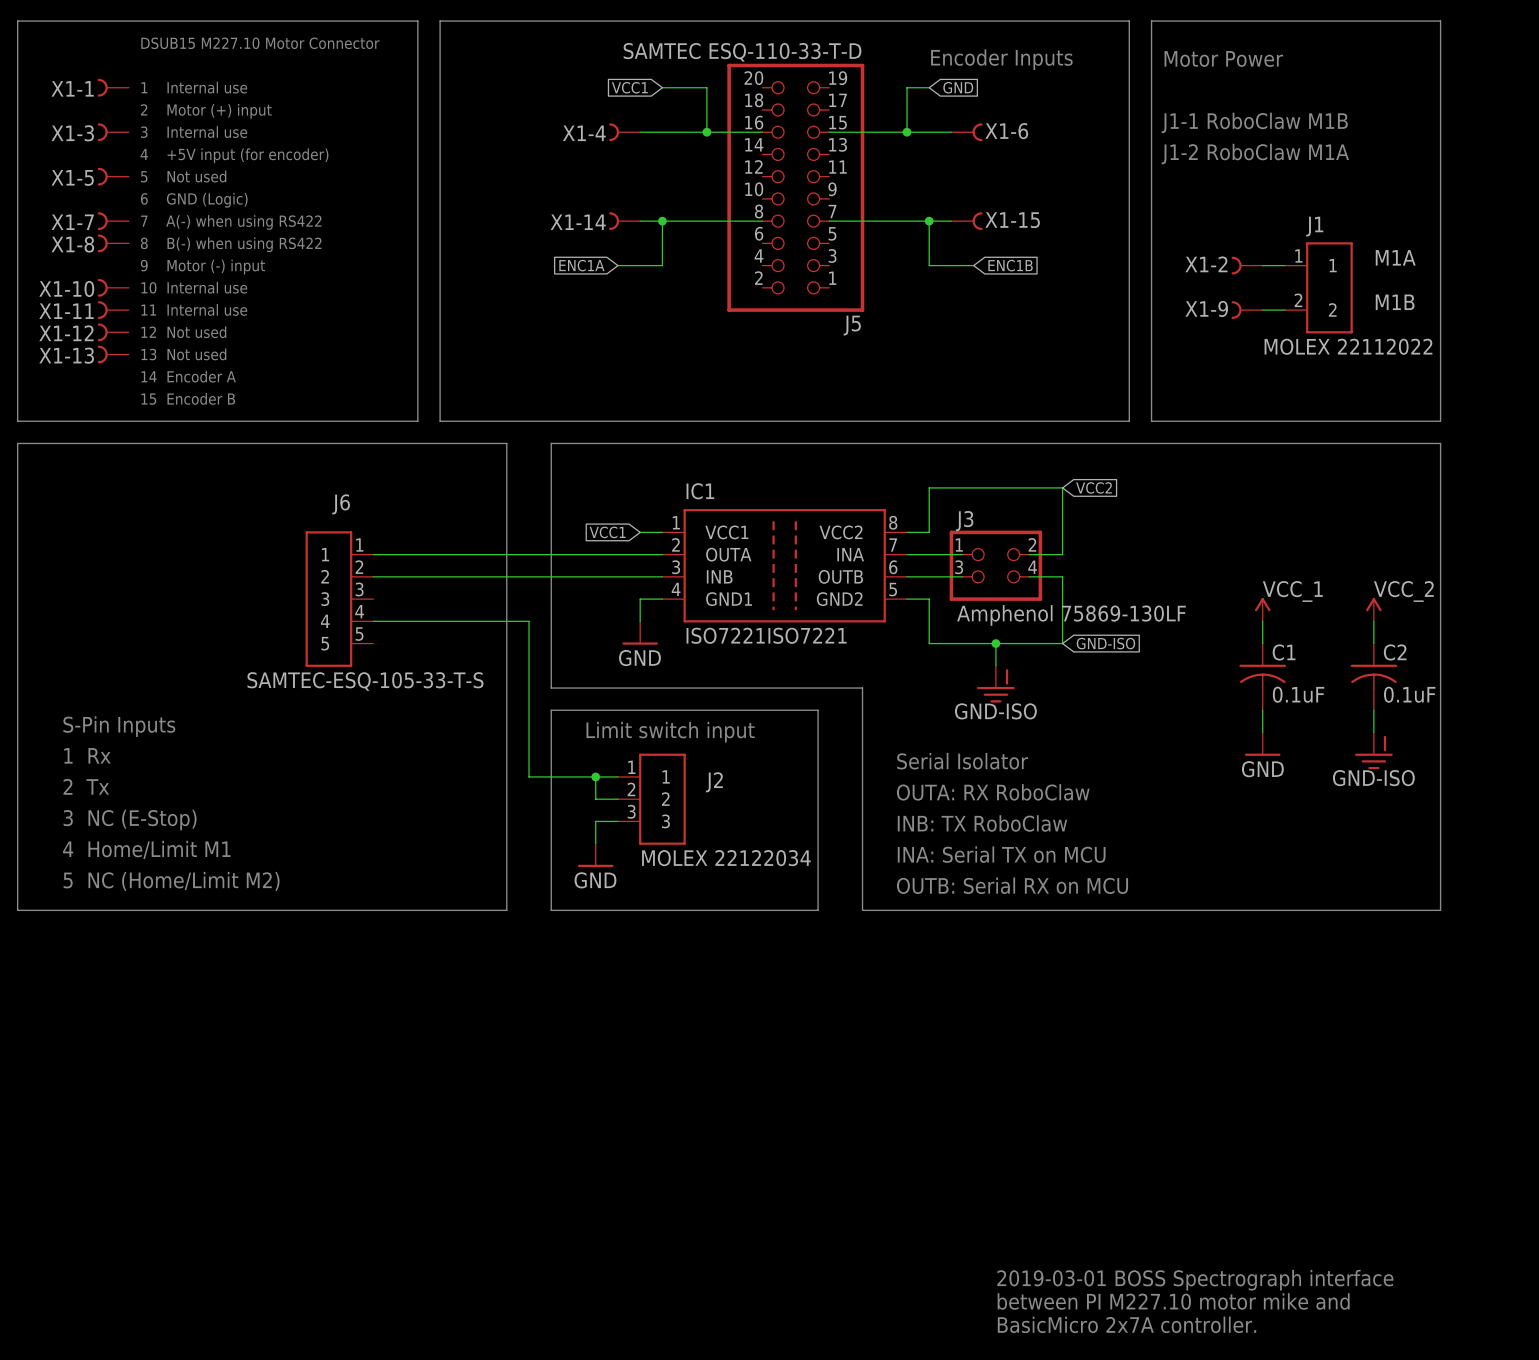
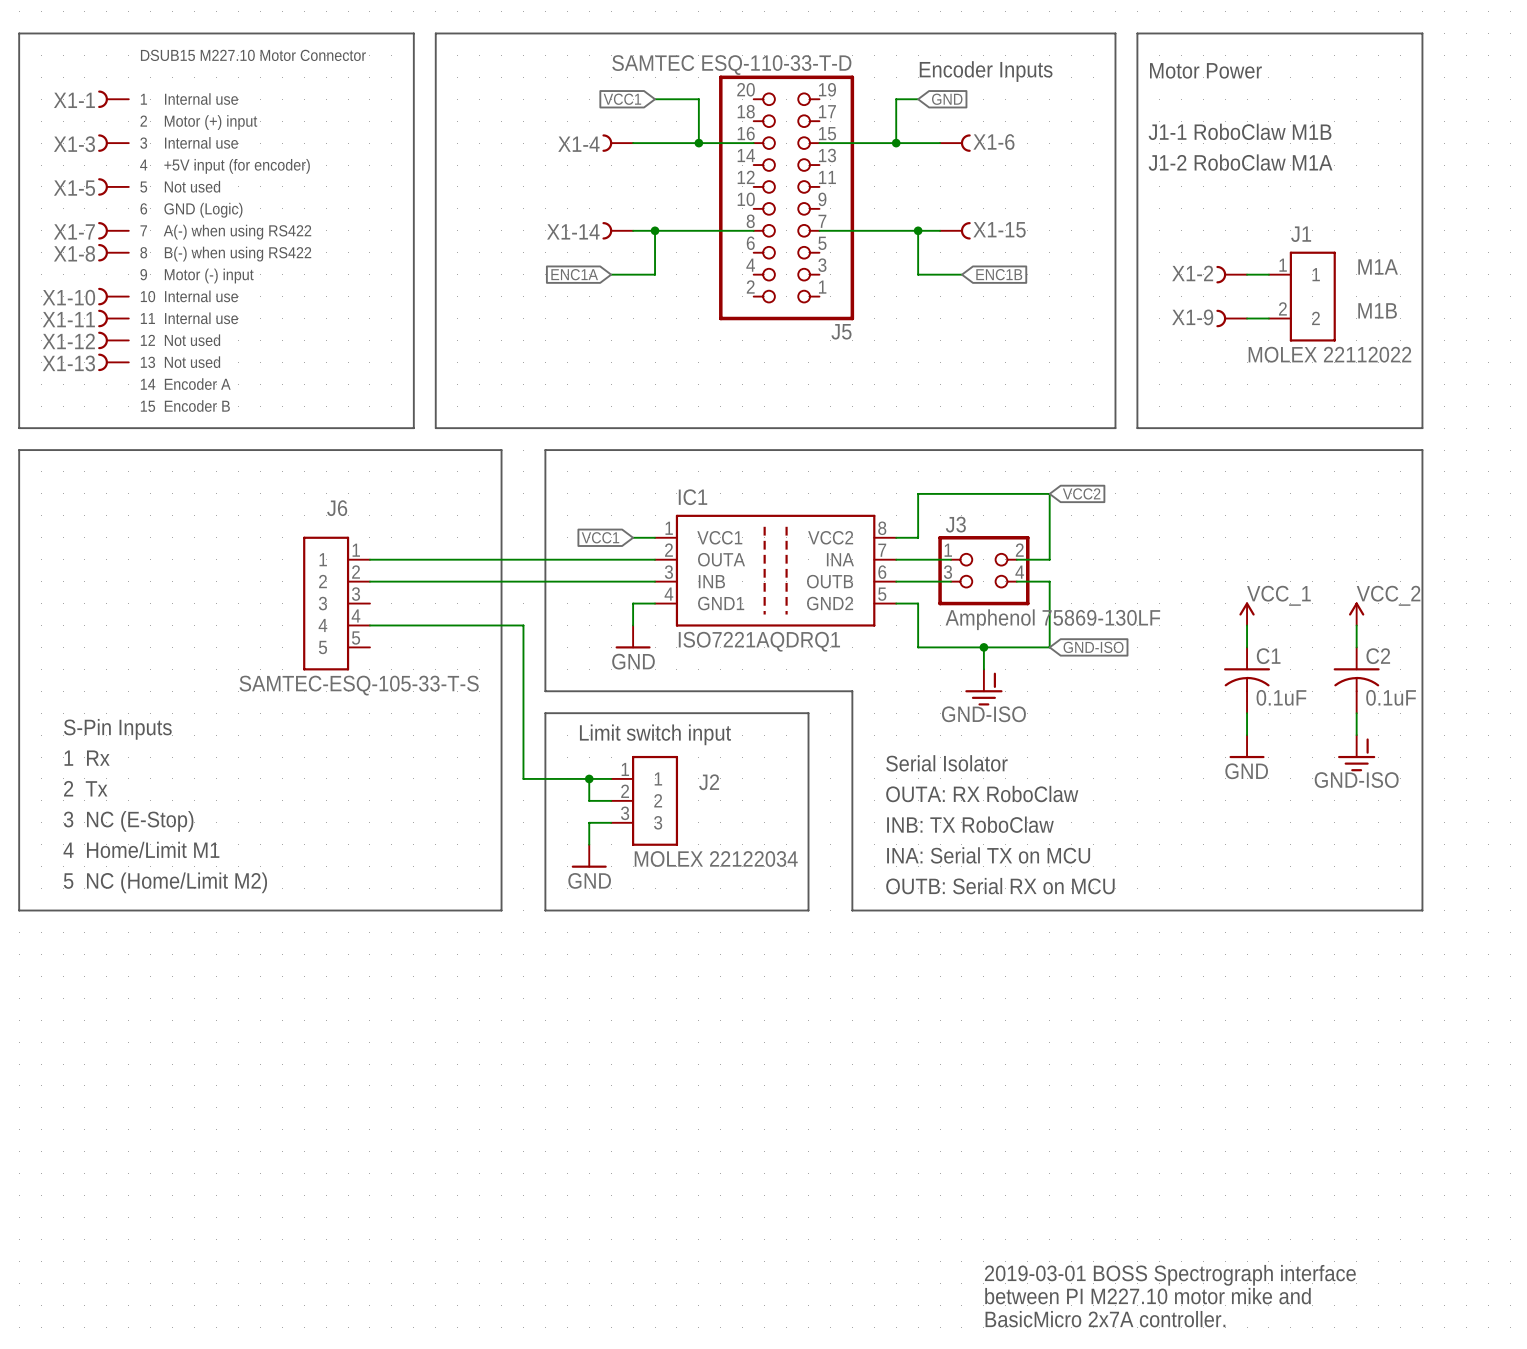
IC1 value: ISO7221ISO7221 (766, 635) -> ISO7221AQDRQ1 (759, 641)

